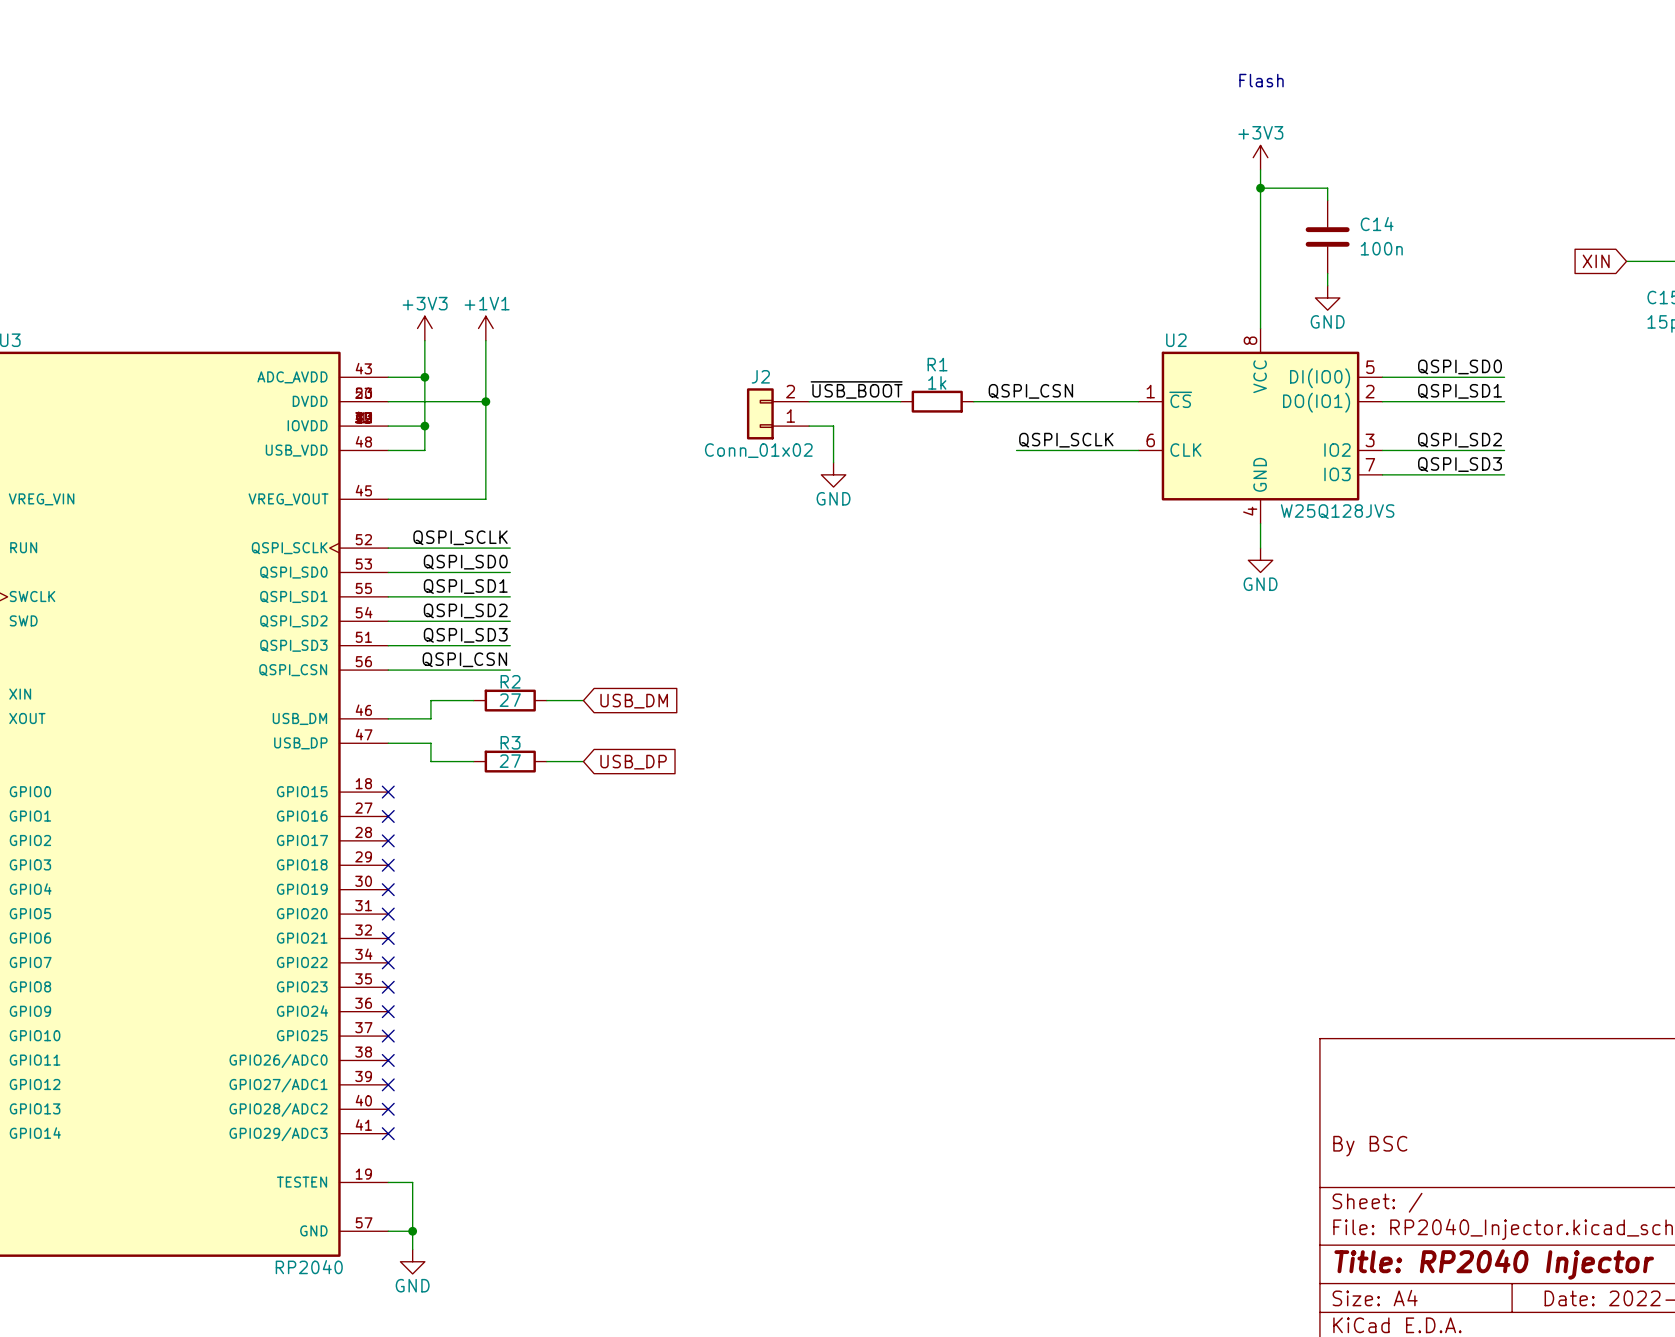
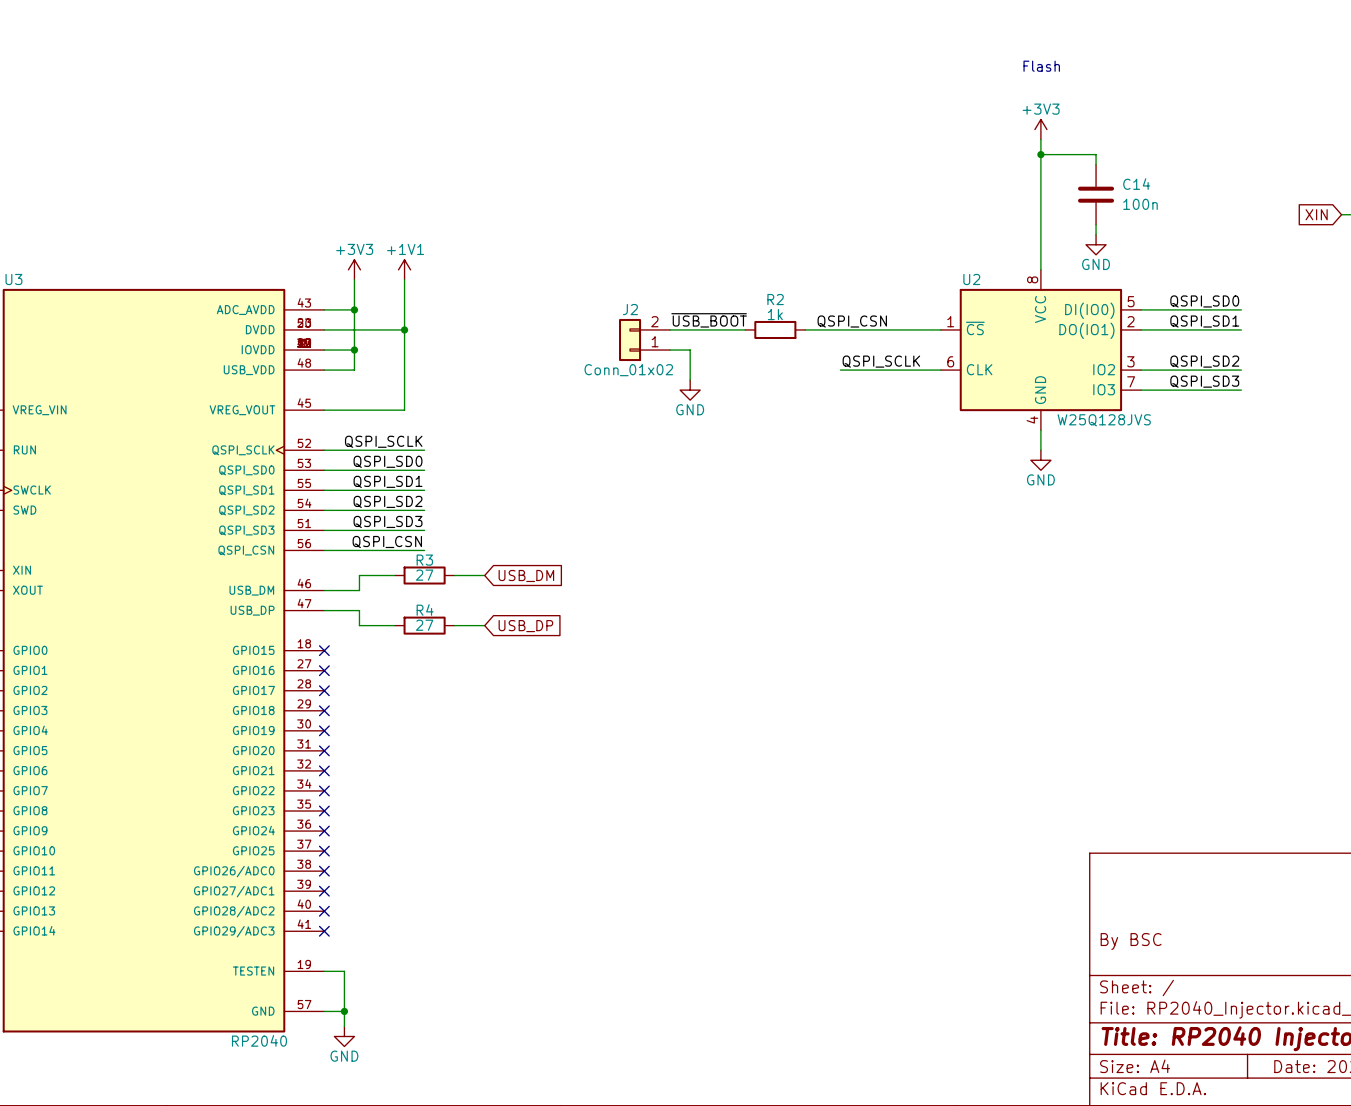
R1 name: R1 (937, 364) -> R2 (775, 299)
R2 name: R2 (510, 681) -> R3 (424, 560)
R3 name: R3 (510, 742) -> R4 (425, 609)

